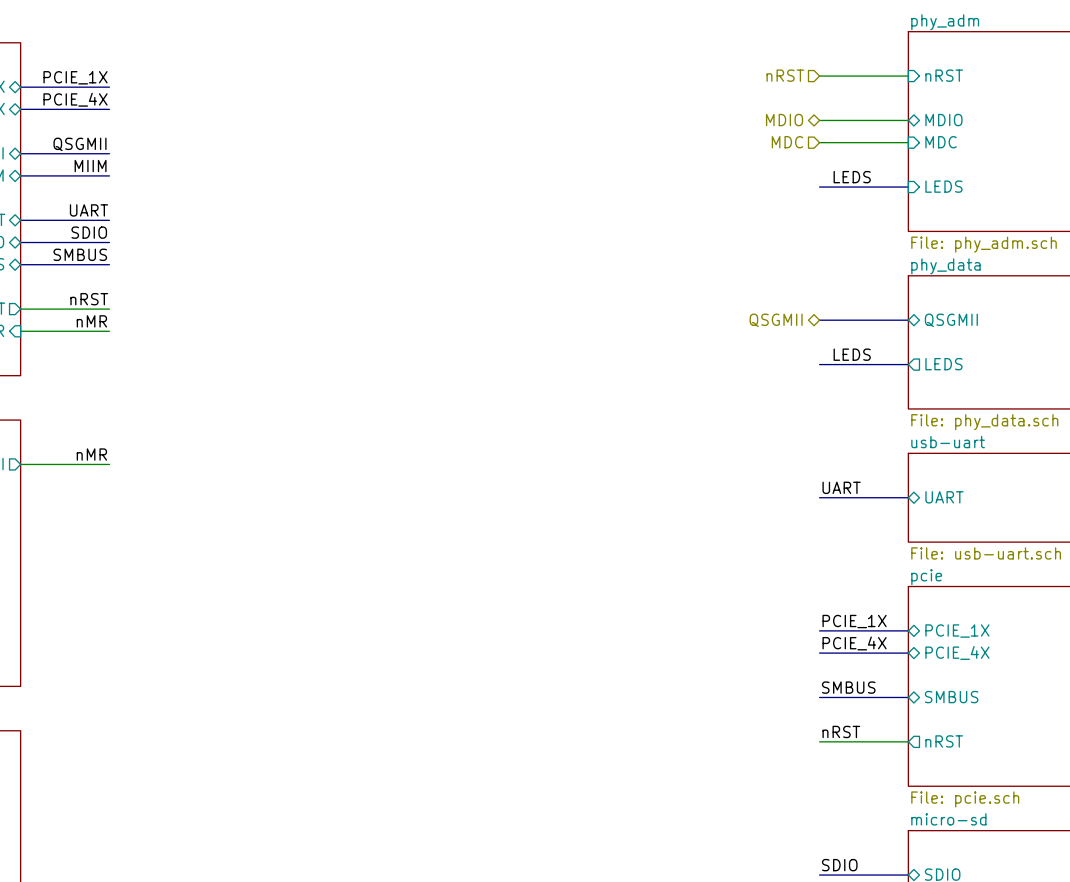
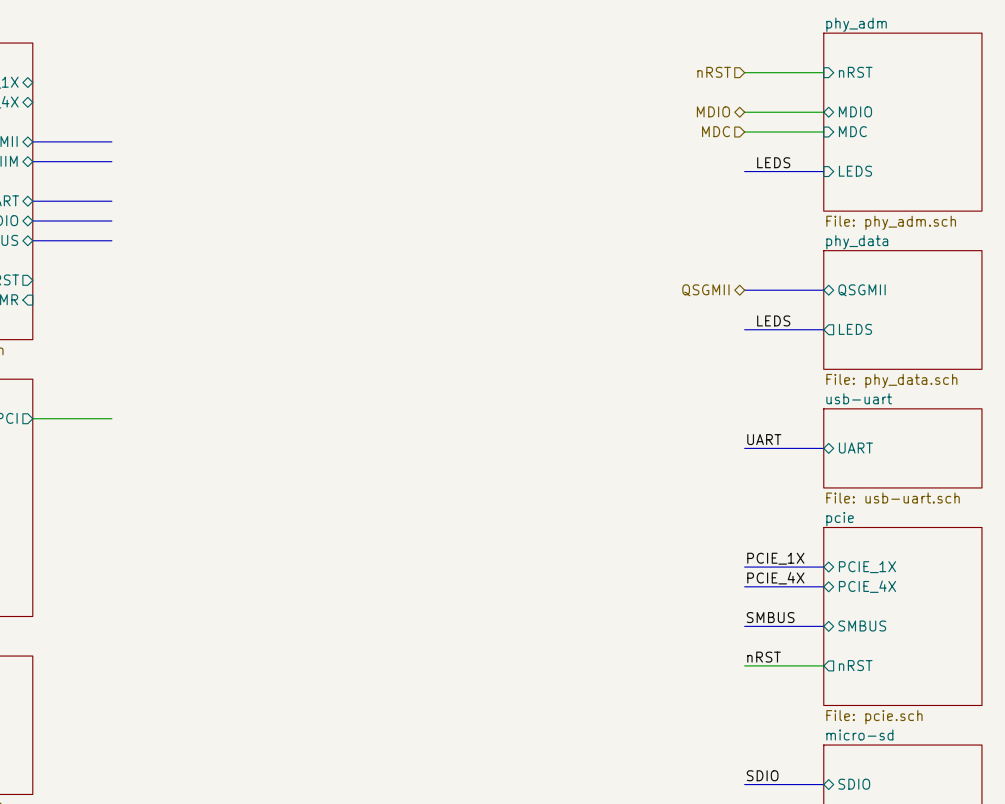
label: PCIE_1X (75, 77) -> none
bus: (20, 87) (109, 87) -> none
label: PCIE_4X (75, 99) -> none
bus: (20, 109) (109, 109) -> none
label: QSGMII (80, 144) -> none
label: MIIM (90, 166) -> none
label: UART (88, 210) -> none
label: SDIO (89, 232) -> none
label: SMBUS (80, 254) -> none
label: nRST (89, 299) -> none
wire: (20, 309) (109, 309) -> none
label: nMR (91, 321) -> none
wire: (20, 331) (109, 331) -> none
label: nMR (91, 454) -> none

